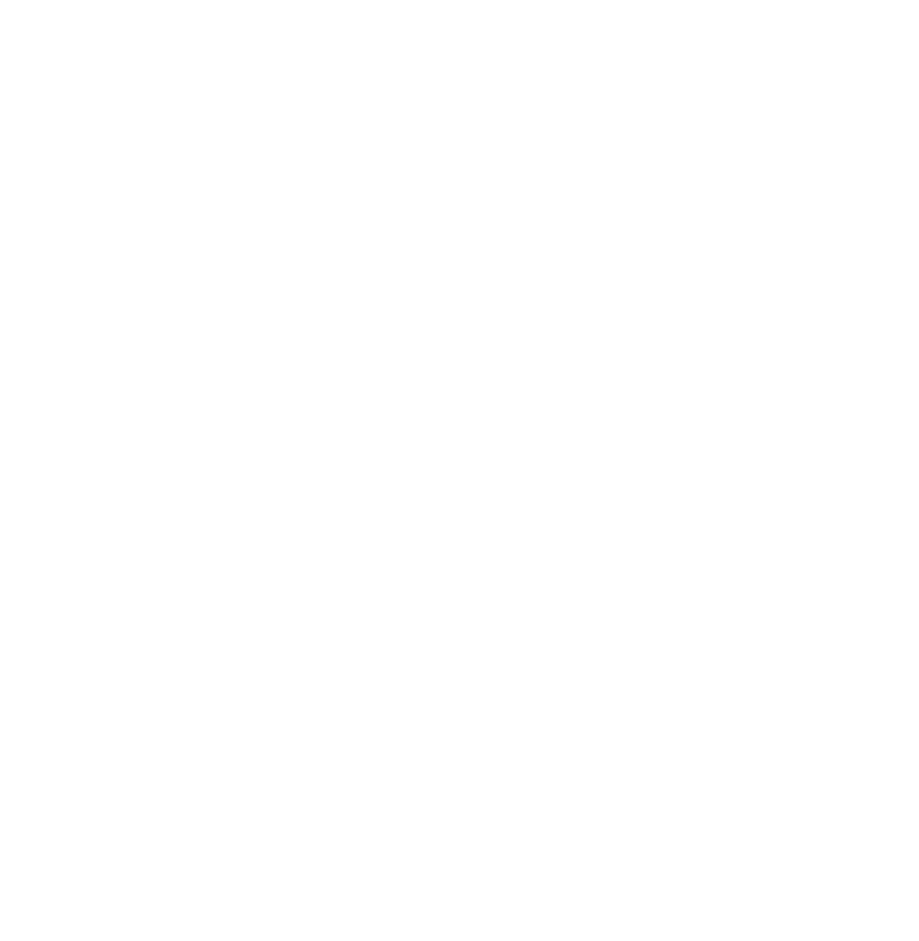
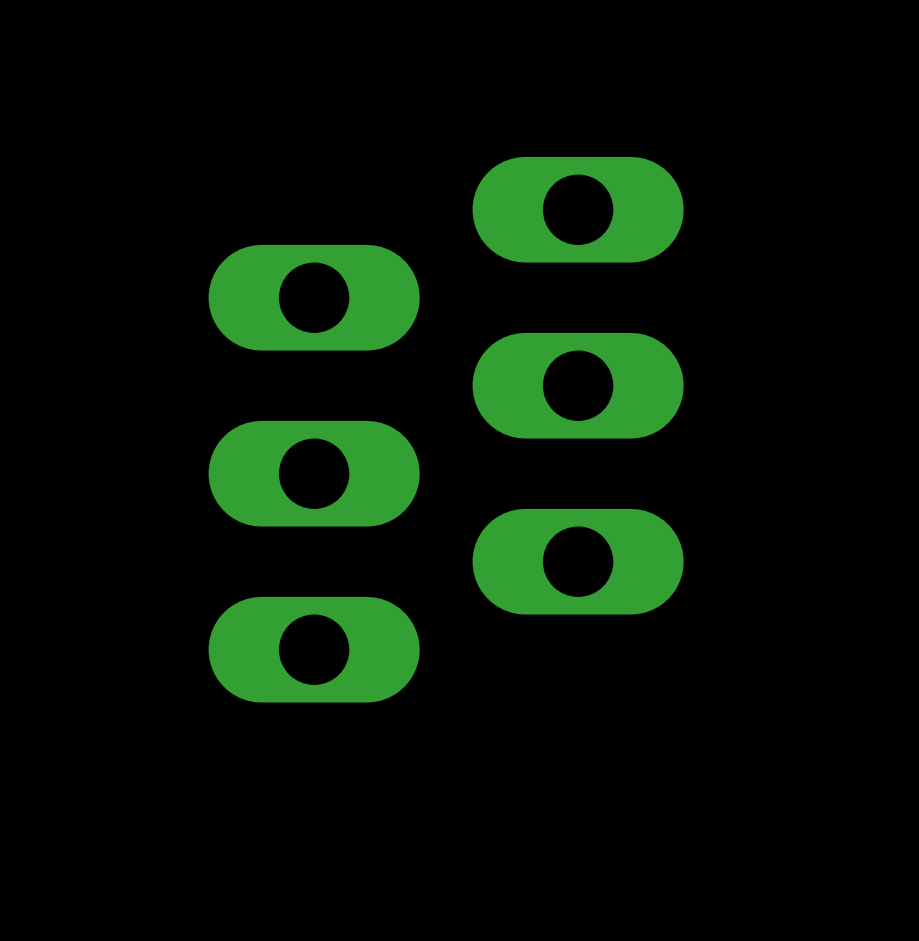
part: none -> (578, 385)
part: none -> (314, 473)

